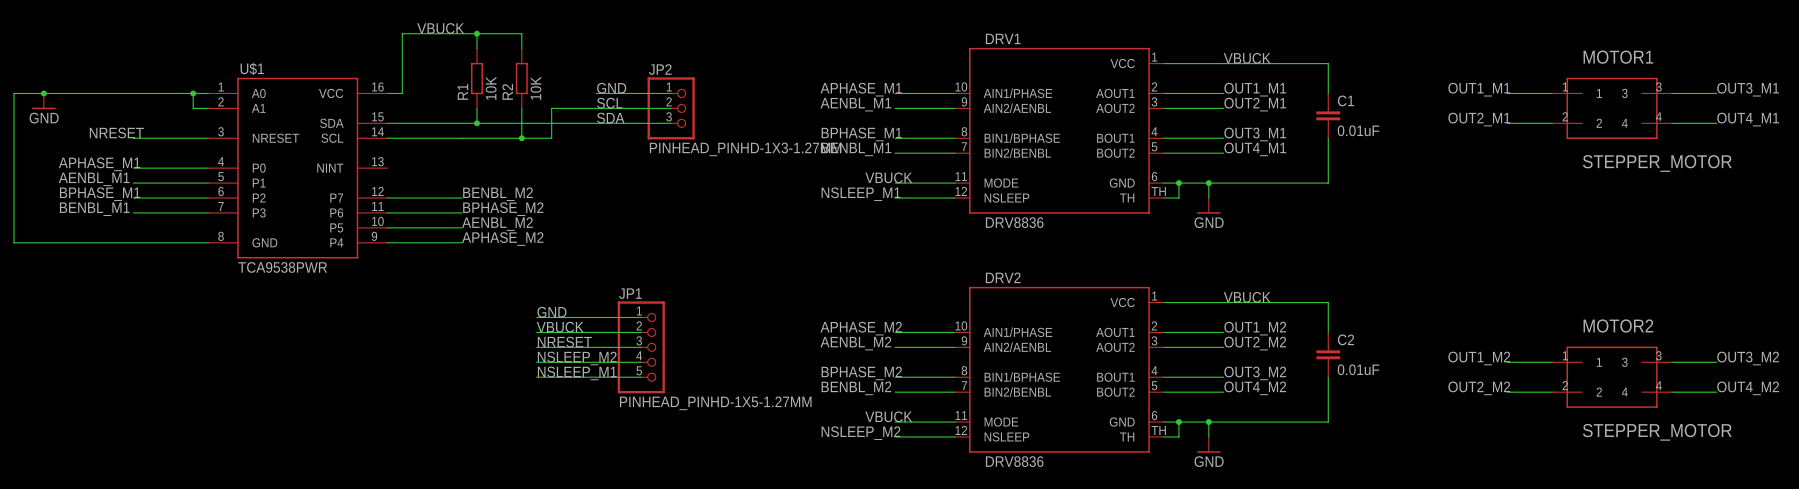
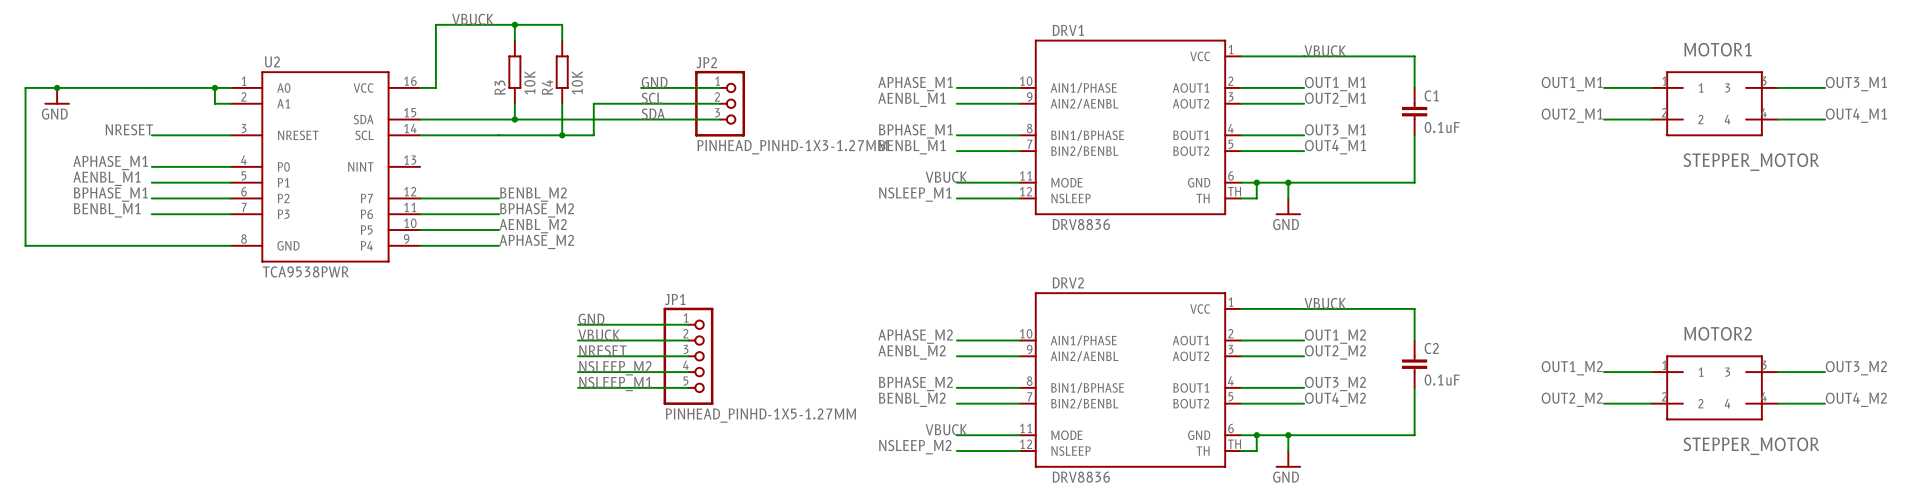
U$1 name: U$1 (252, 68) -> U2 (272, 61)
R1 name: R1 (462, 91) -> R3 (500, 87)
R2 name: R2 (507, 91) -> R4 (547, 87)
C1 value: 0.01uF (1358, 130) -> 0.1uF (1442, 127)
C2 value: 0.01uF (1358, 369) -> 0.1uF (1442, 380)

